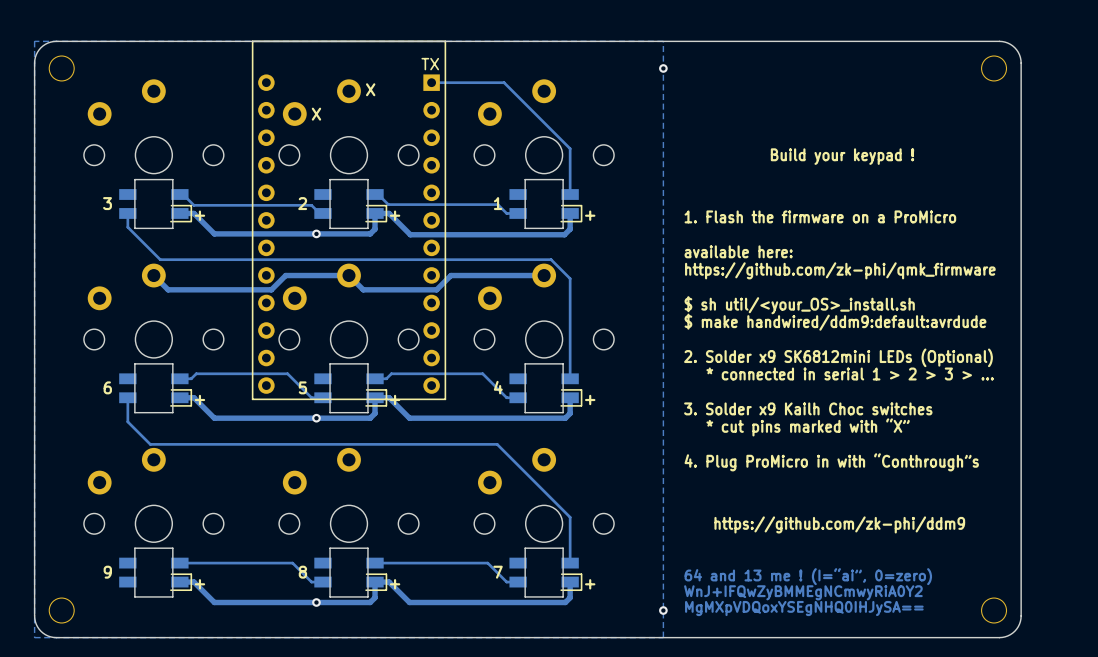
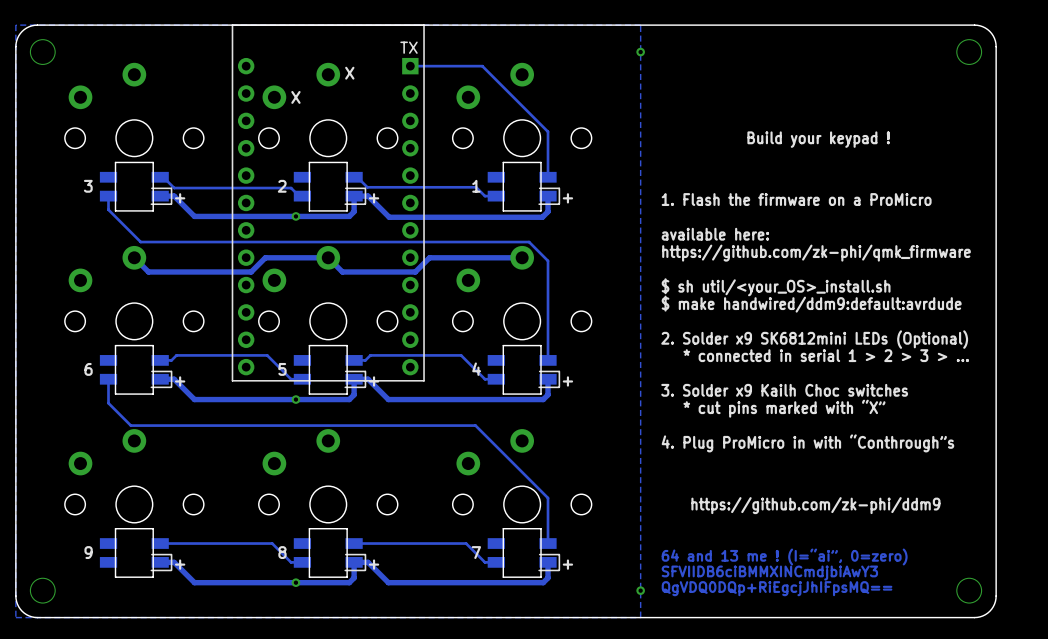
text: WnJ+IFQwZyBMMEgNCmwyRiA0Y2 (803, 592) -> SFVIIDB6ciBMMXINCmdjbiAwY3 (769, 573)
text: MgMXpVDQoxYSEgNHQ0IHJySA== (804, 608) -> QgVDQ0DQp+RiEgcjJhIFpsMQ== (777, 588)

